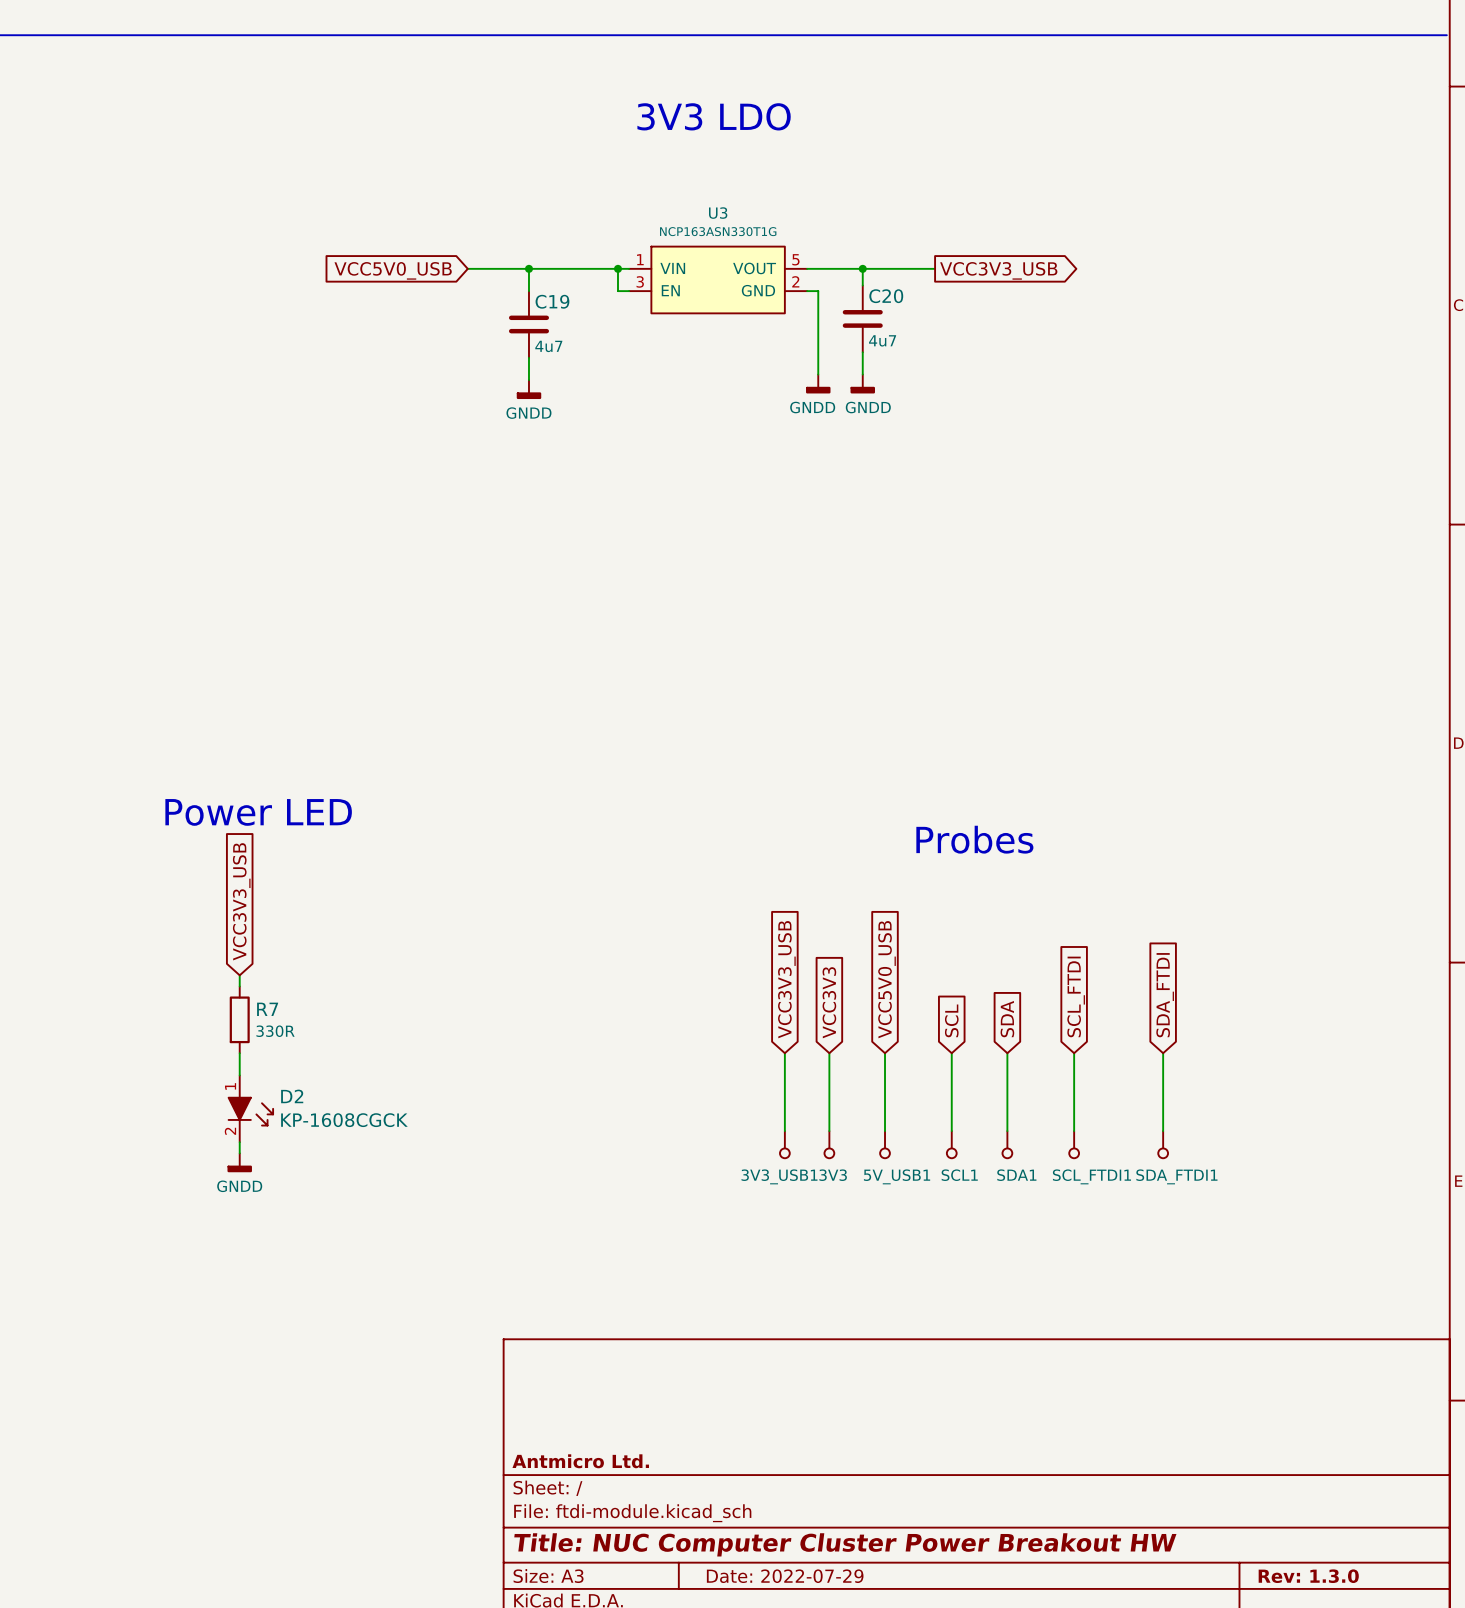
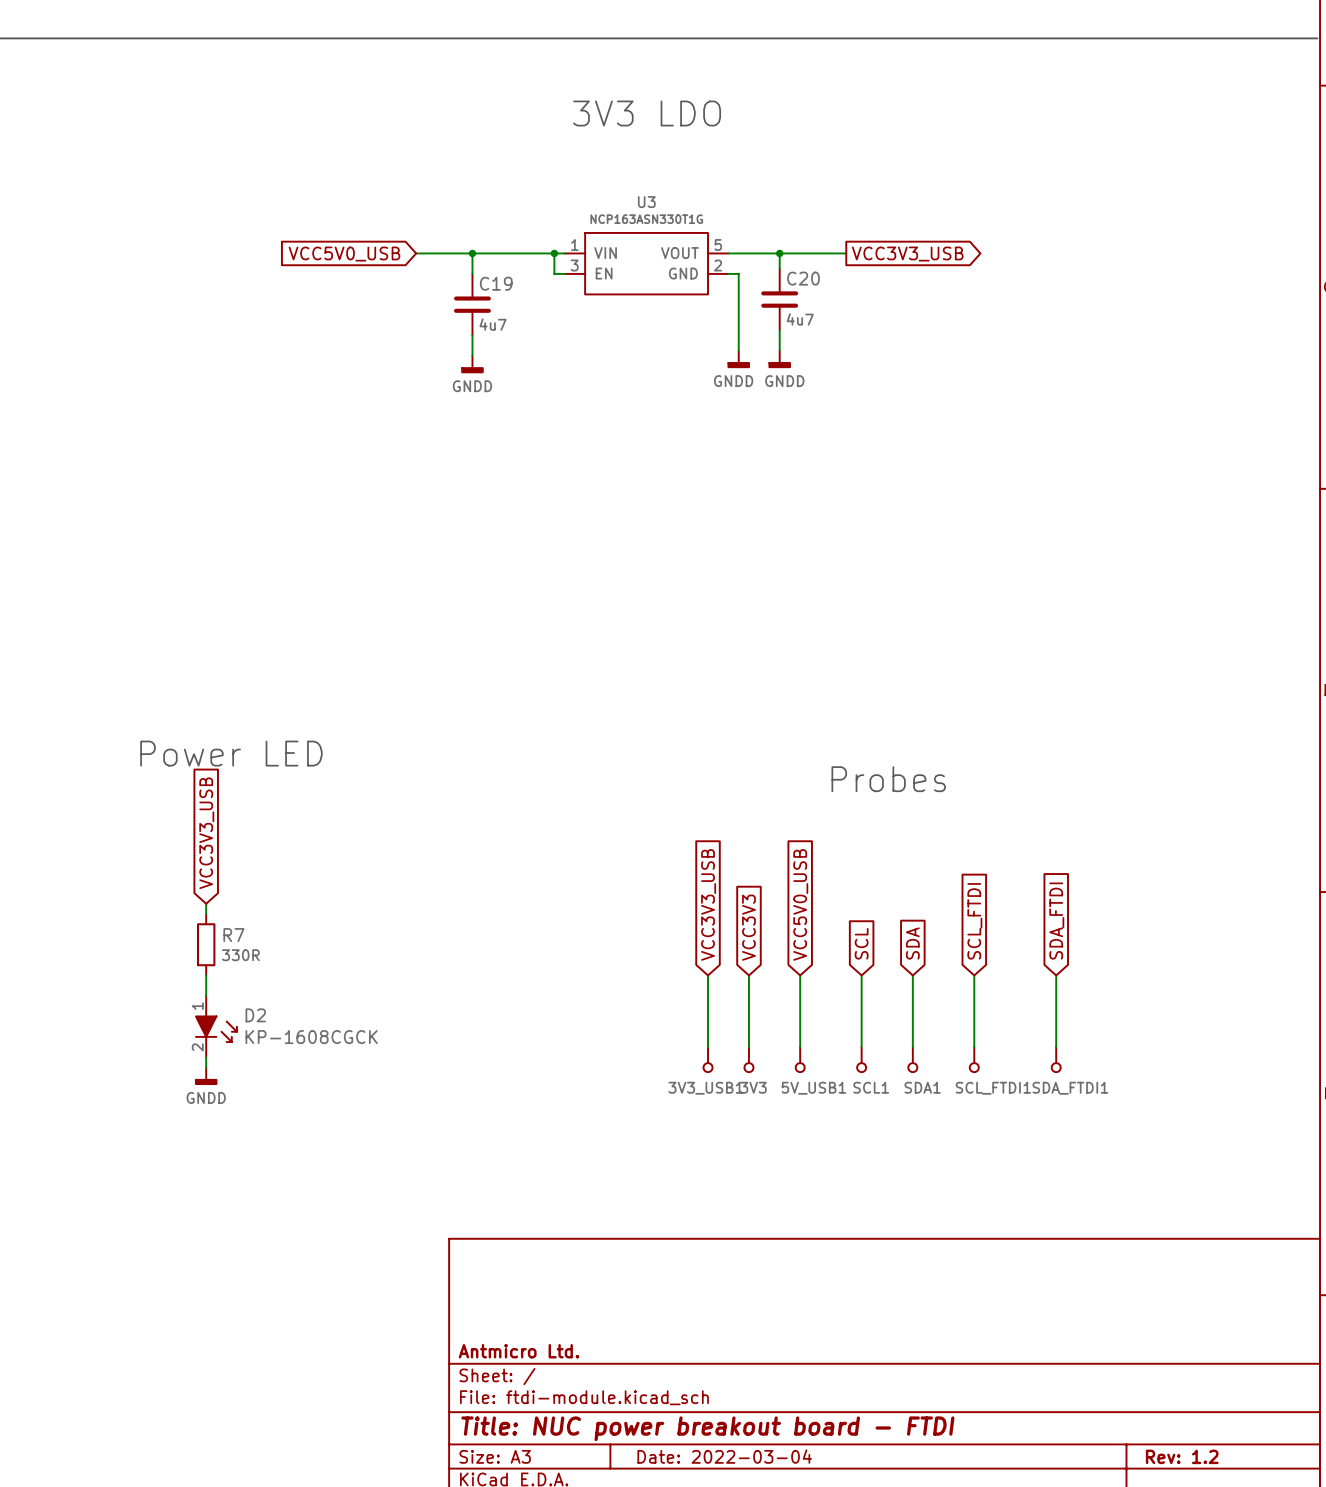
title block: Title: NUC Computer Cluster Power Breakout HW (845, 1544) -> Title: NUC power breakout board - FTDI (707, 1428)
title block: Date: 2022-07-29 (785, 1576) -> Date: 2022-03-04 (724, 1456)
title block: Rev: 1.3.0 (1308, 1576) -> Rev: 1.2 (1182, 1456)

